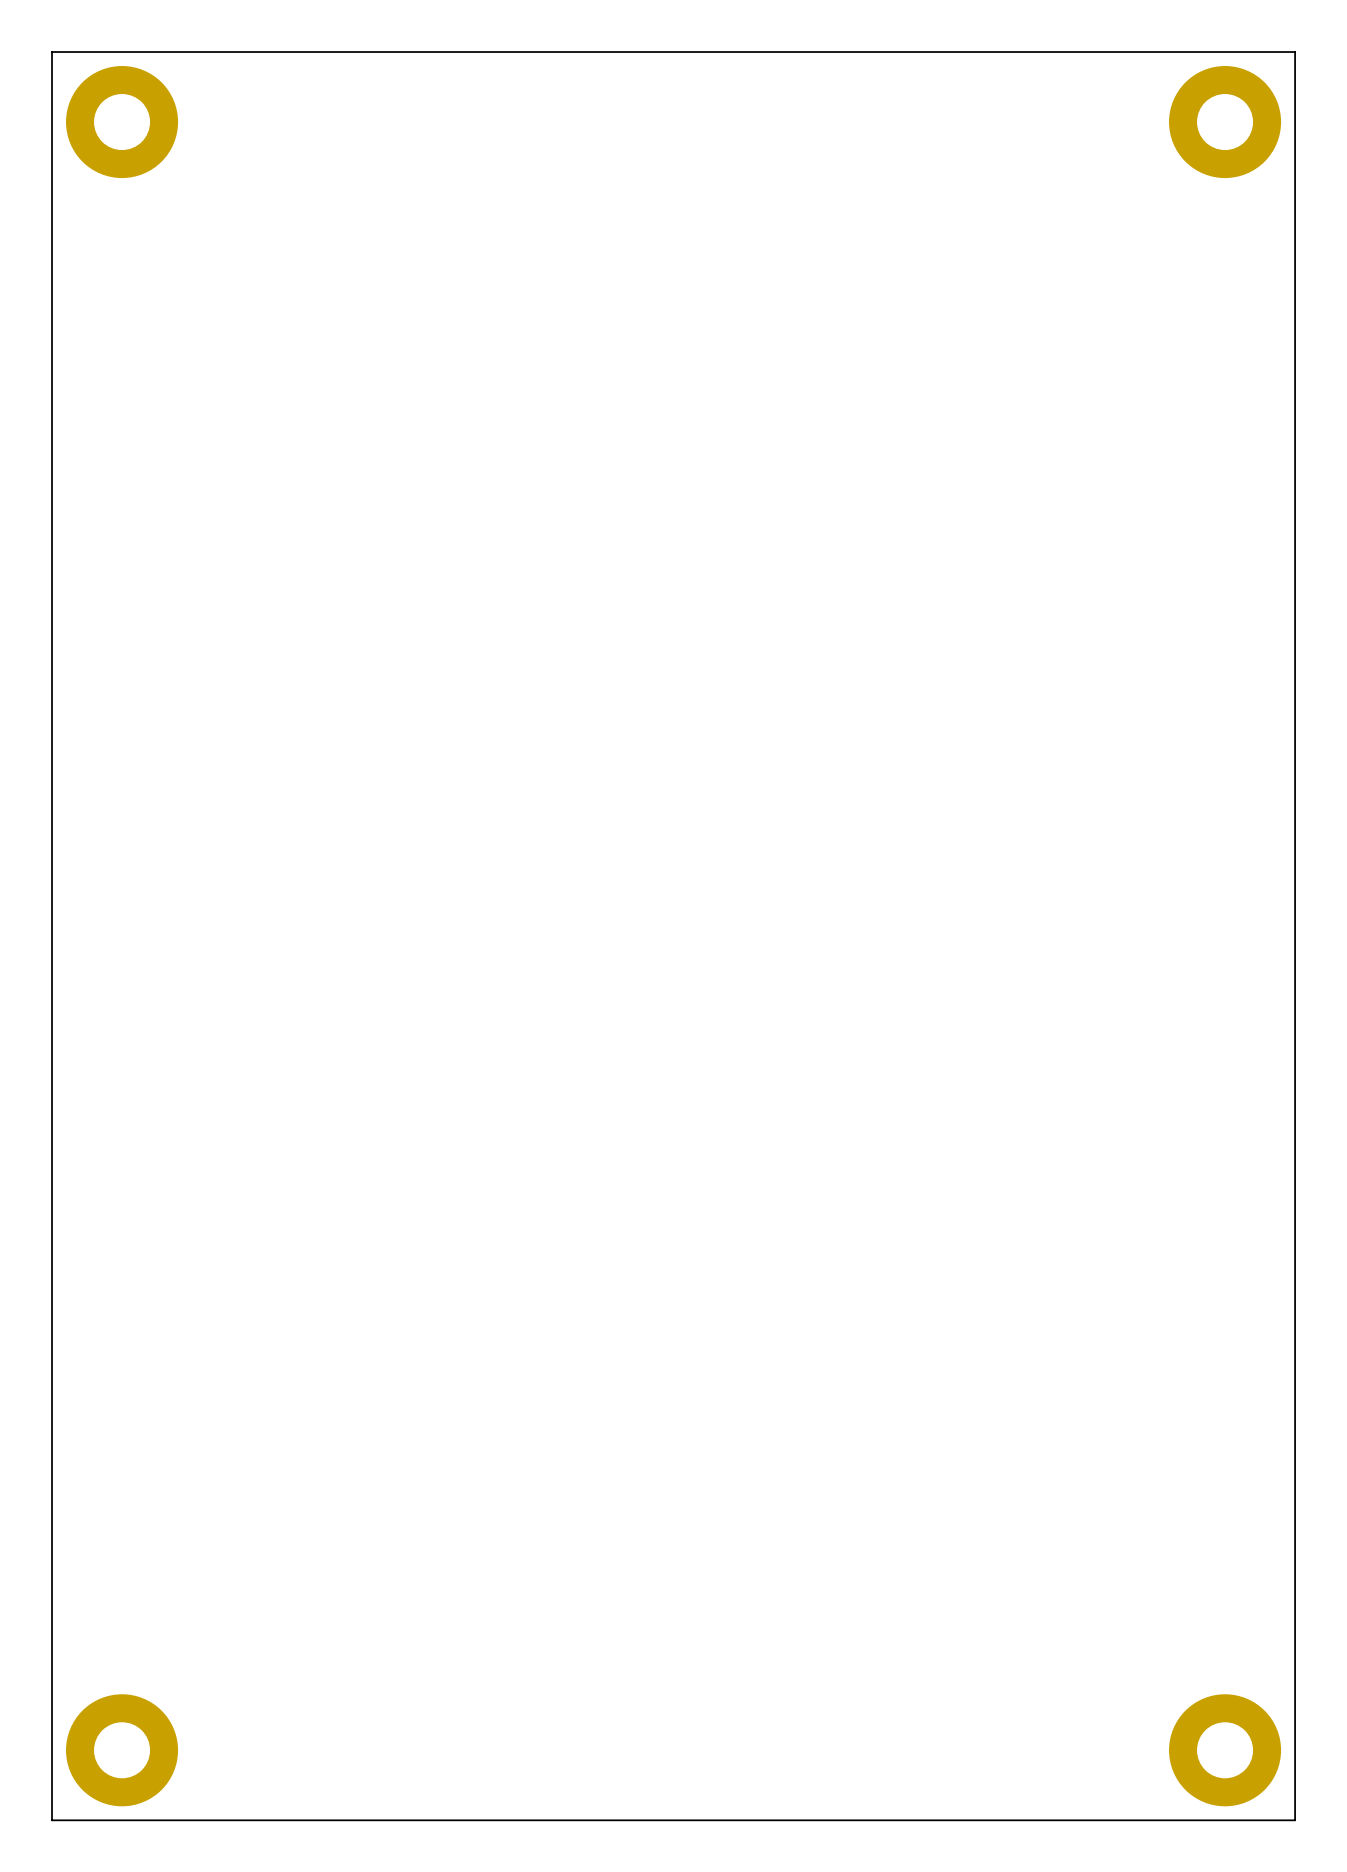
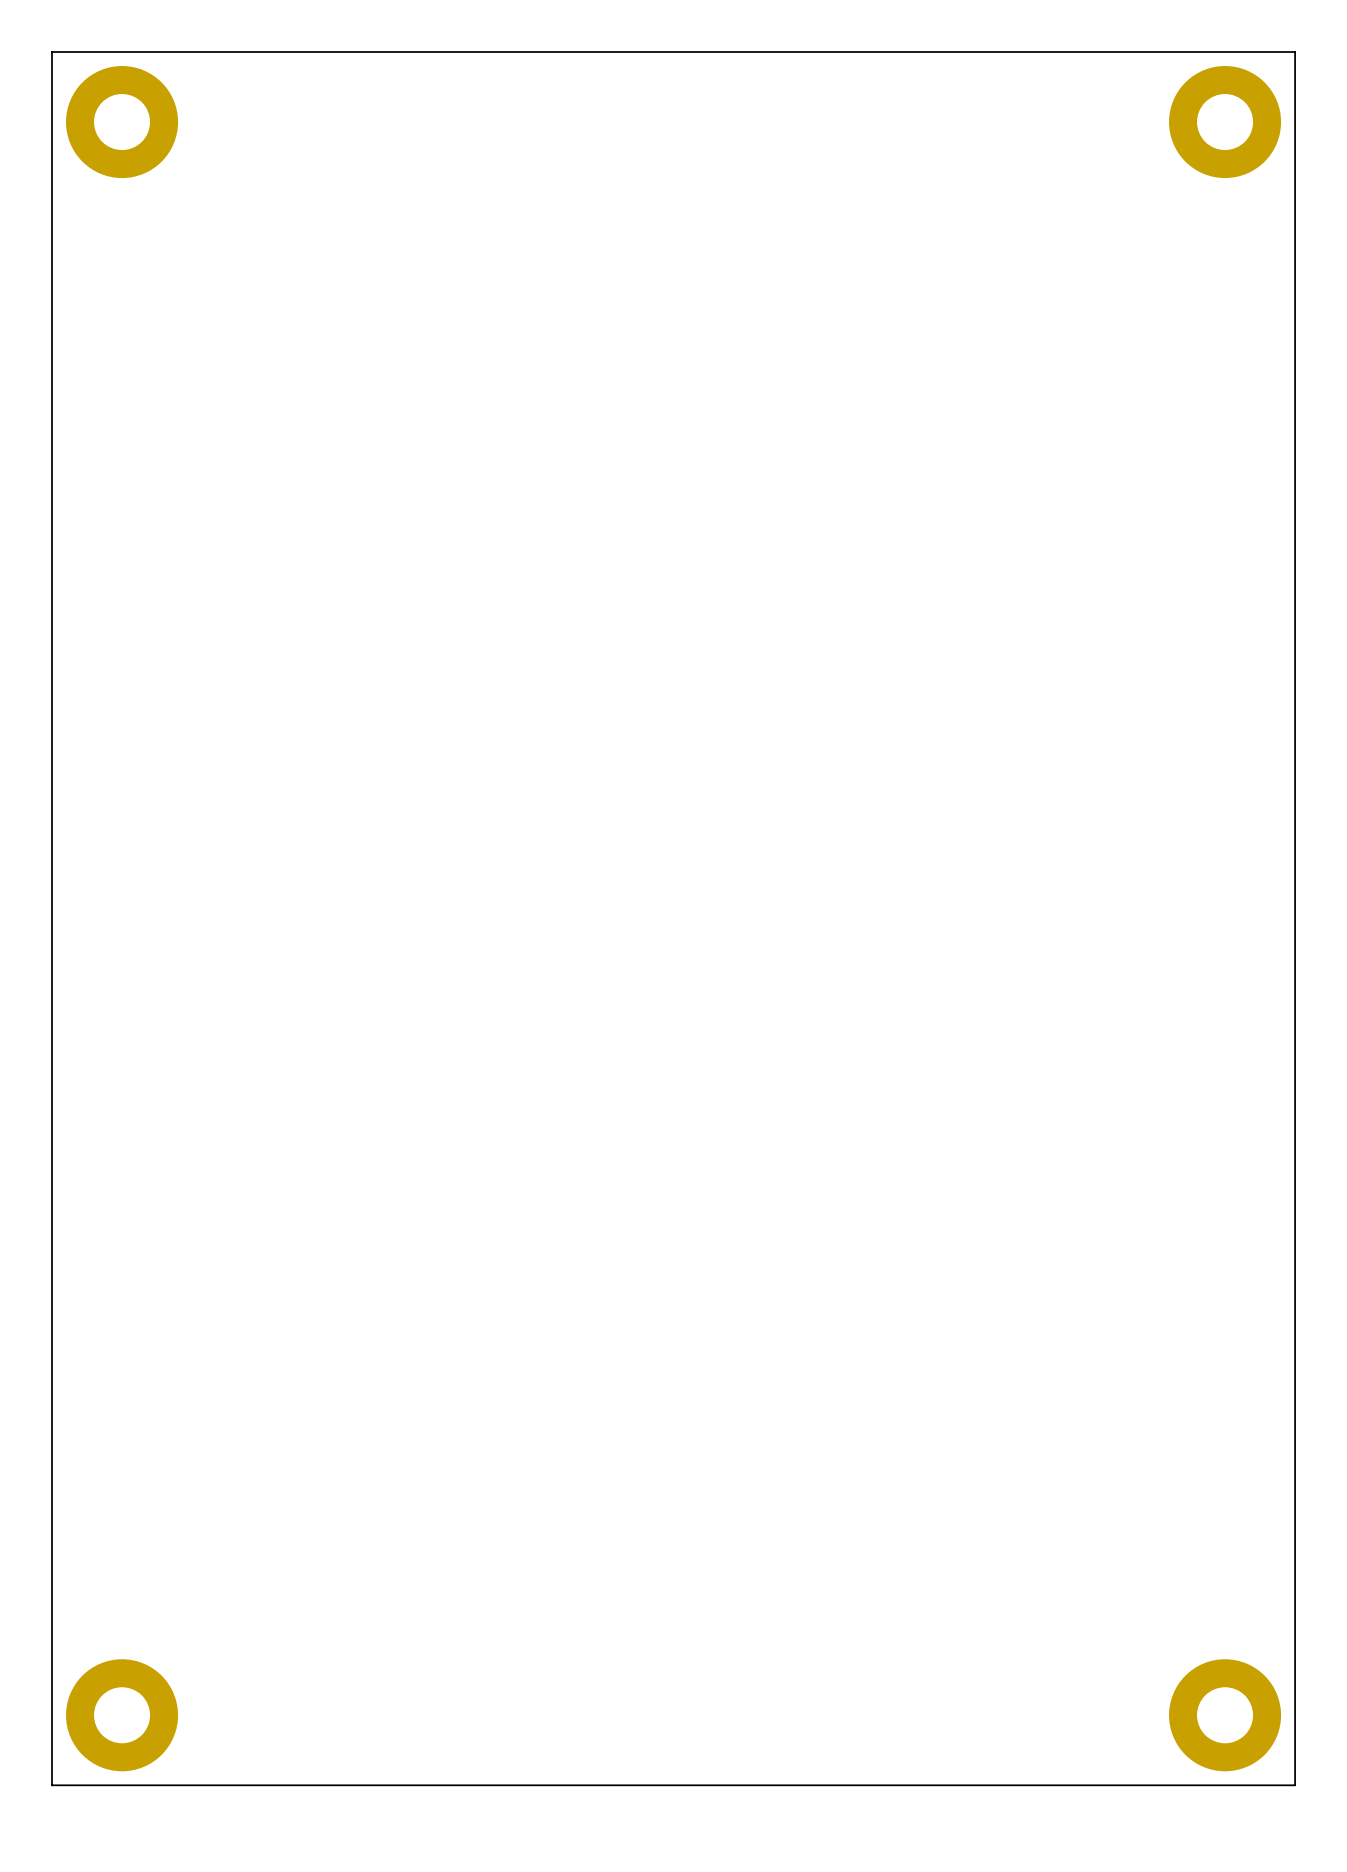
part position: (122, 1750) -> (122, 1715)
part position: (1225, 1750) -> (1225, 1715)
board edge: (1295, 1785) (1295, 1820) (52, 1820) (52, 1785) -> (1295, 1785) (52, 1785)

